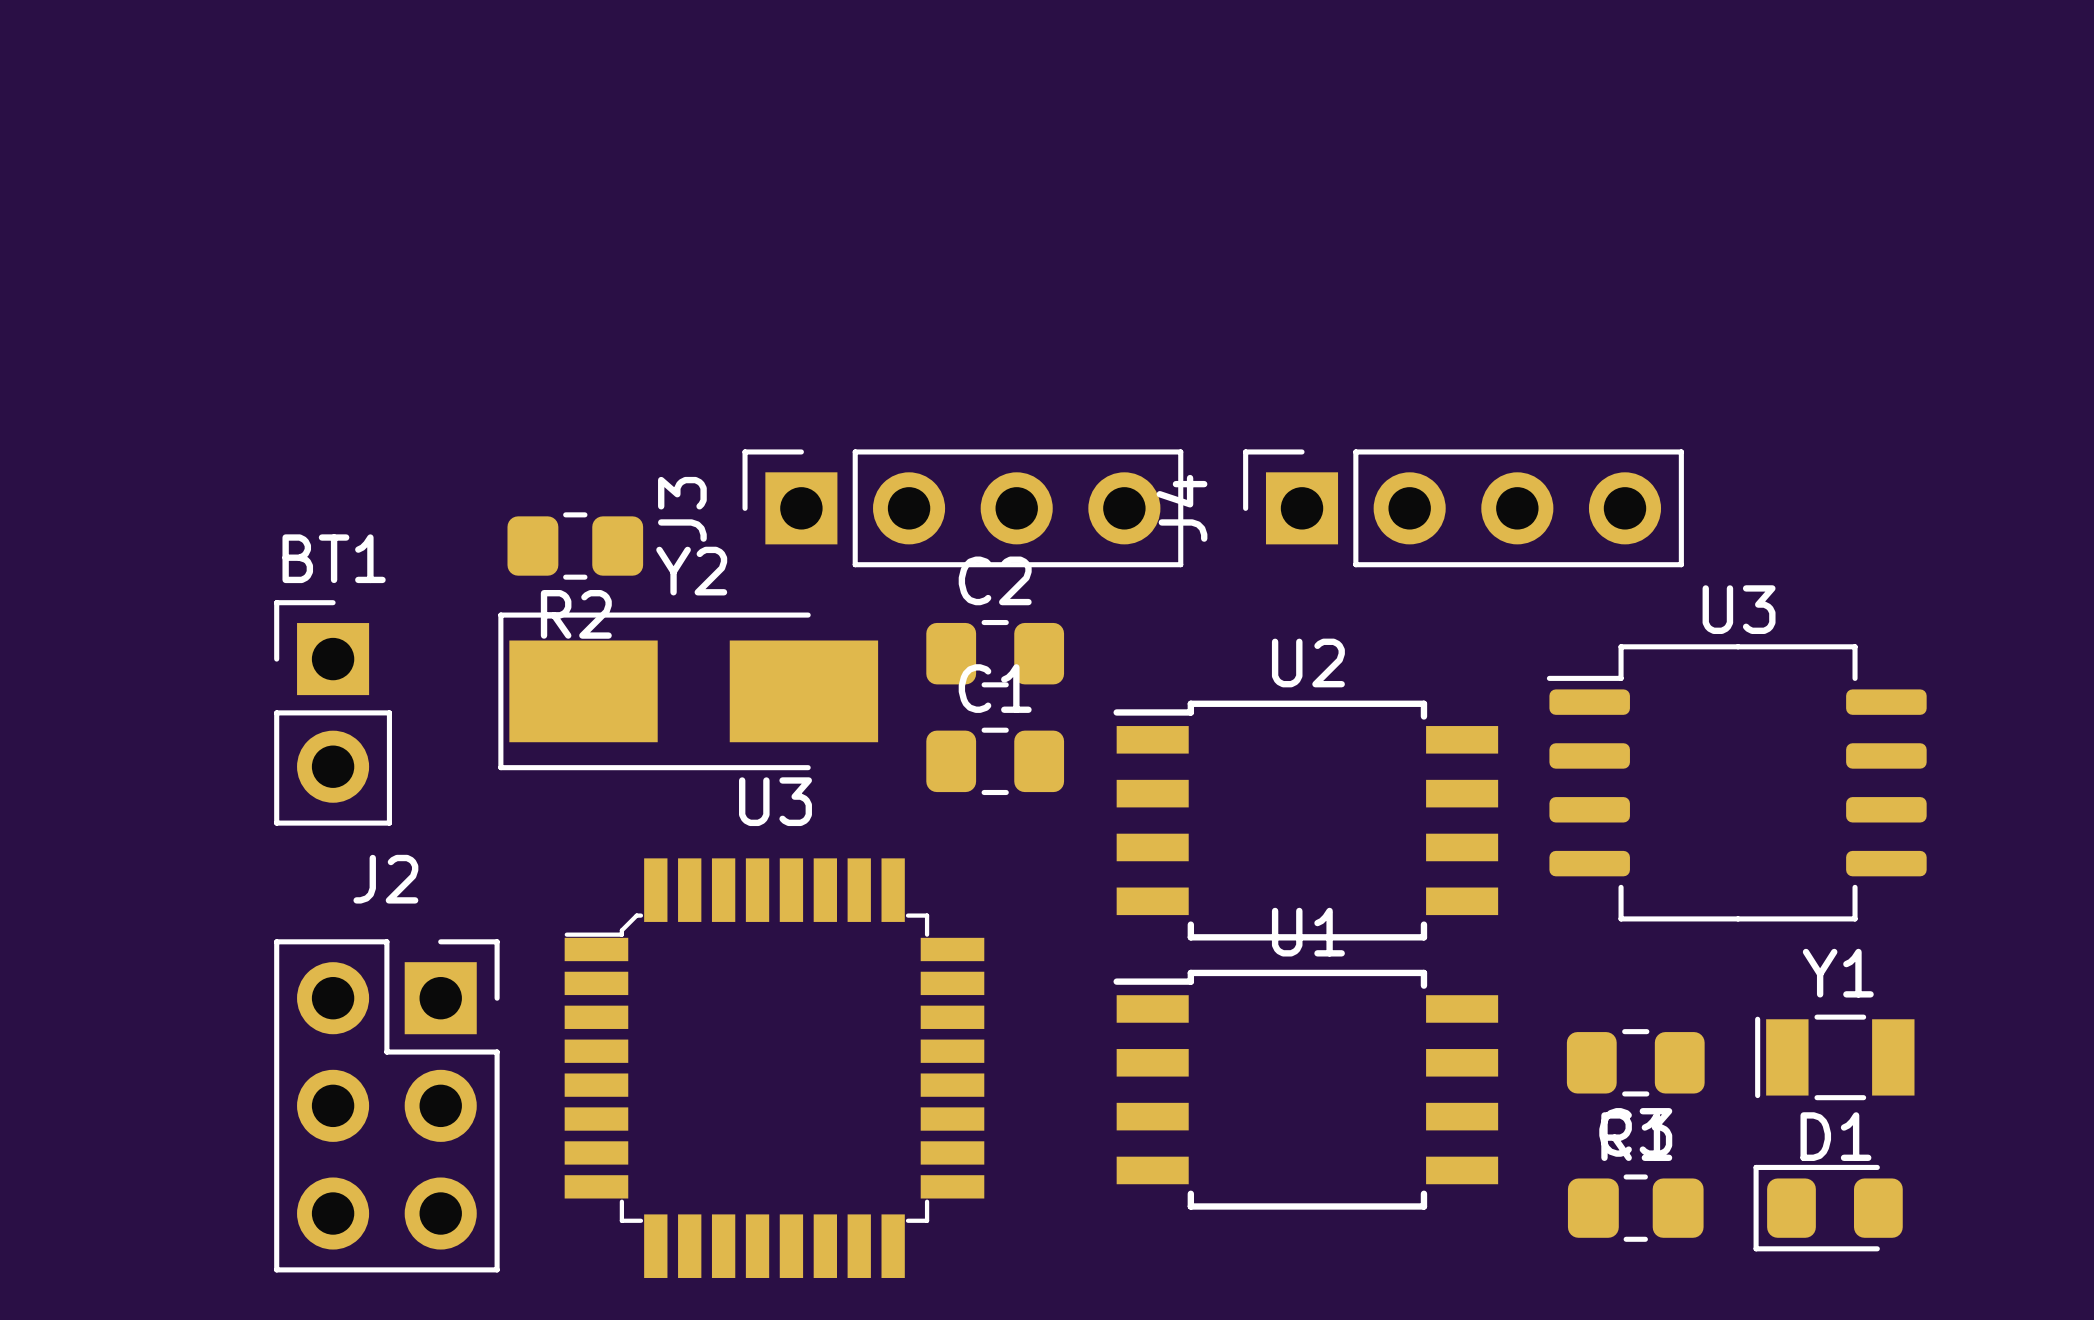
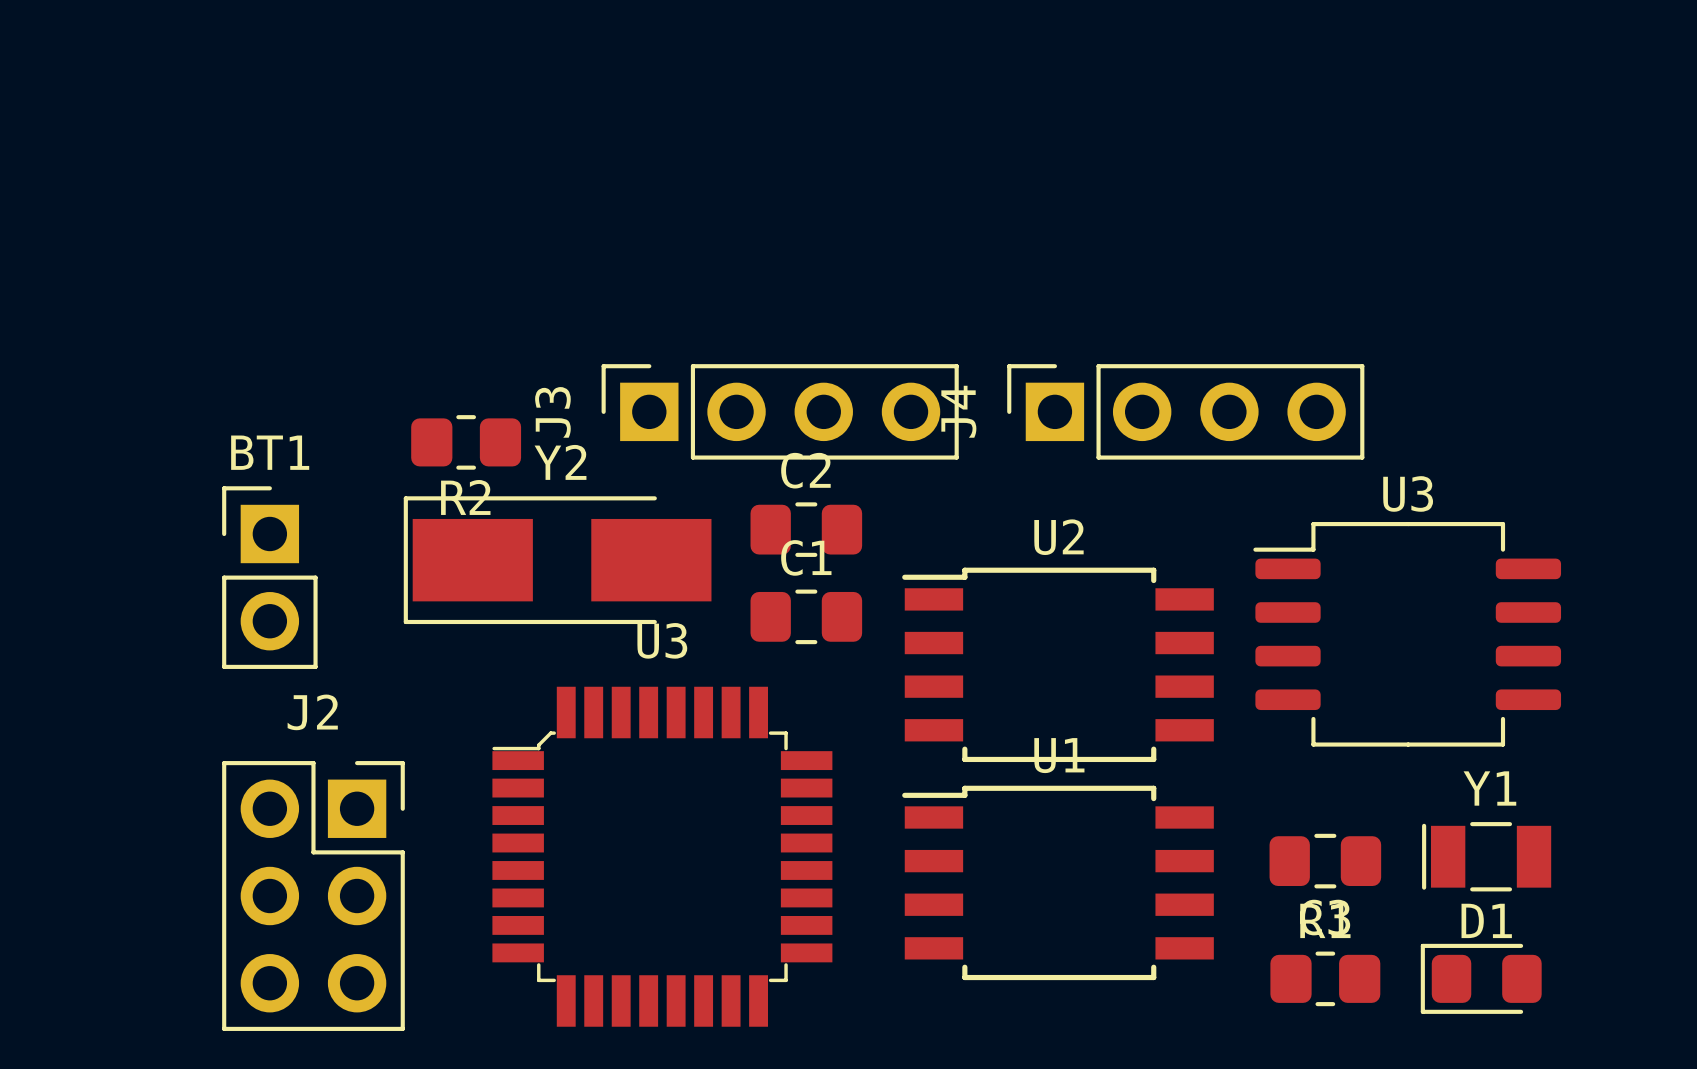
U3 position: (774, 1068) -> (662, 856)

